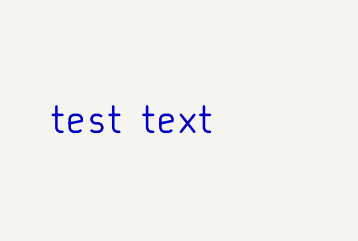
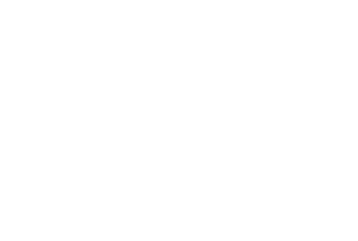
text: test text (131, 119) -> none

